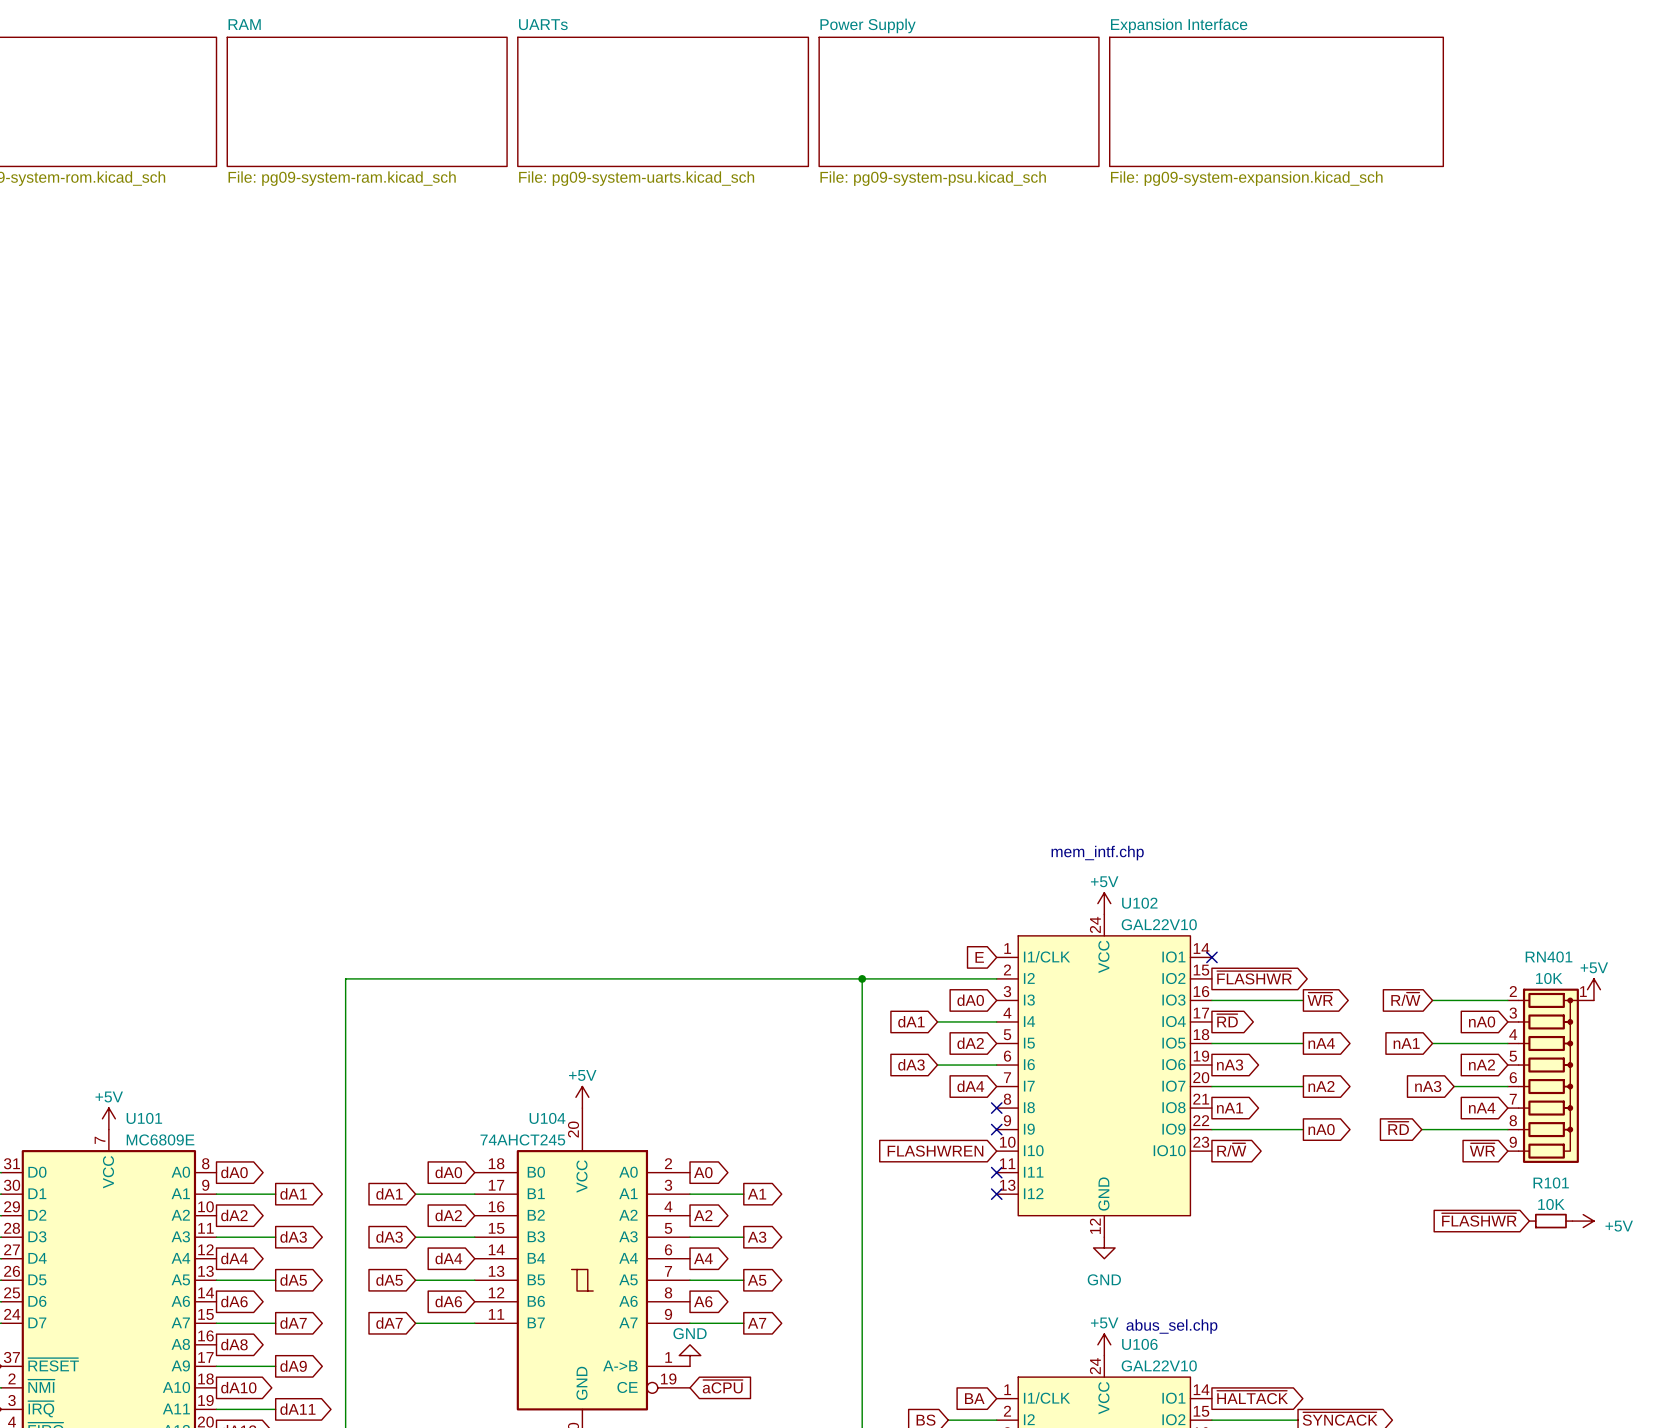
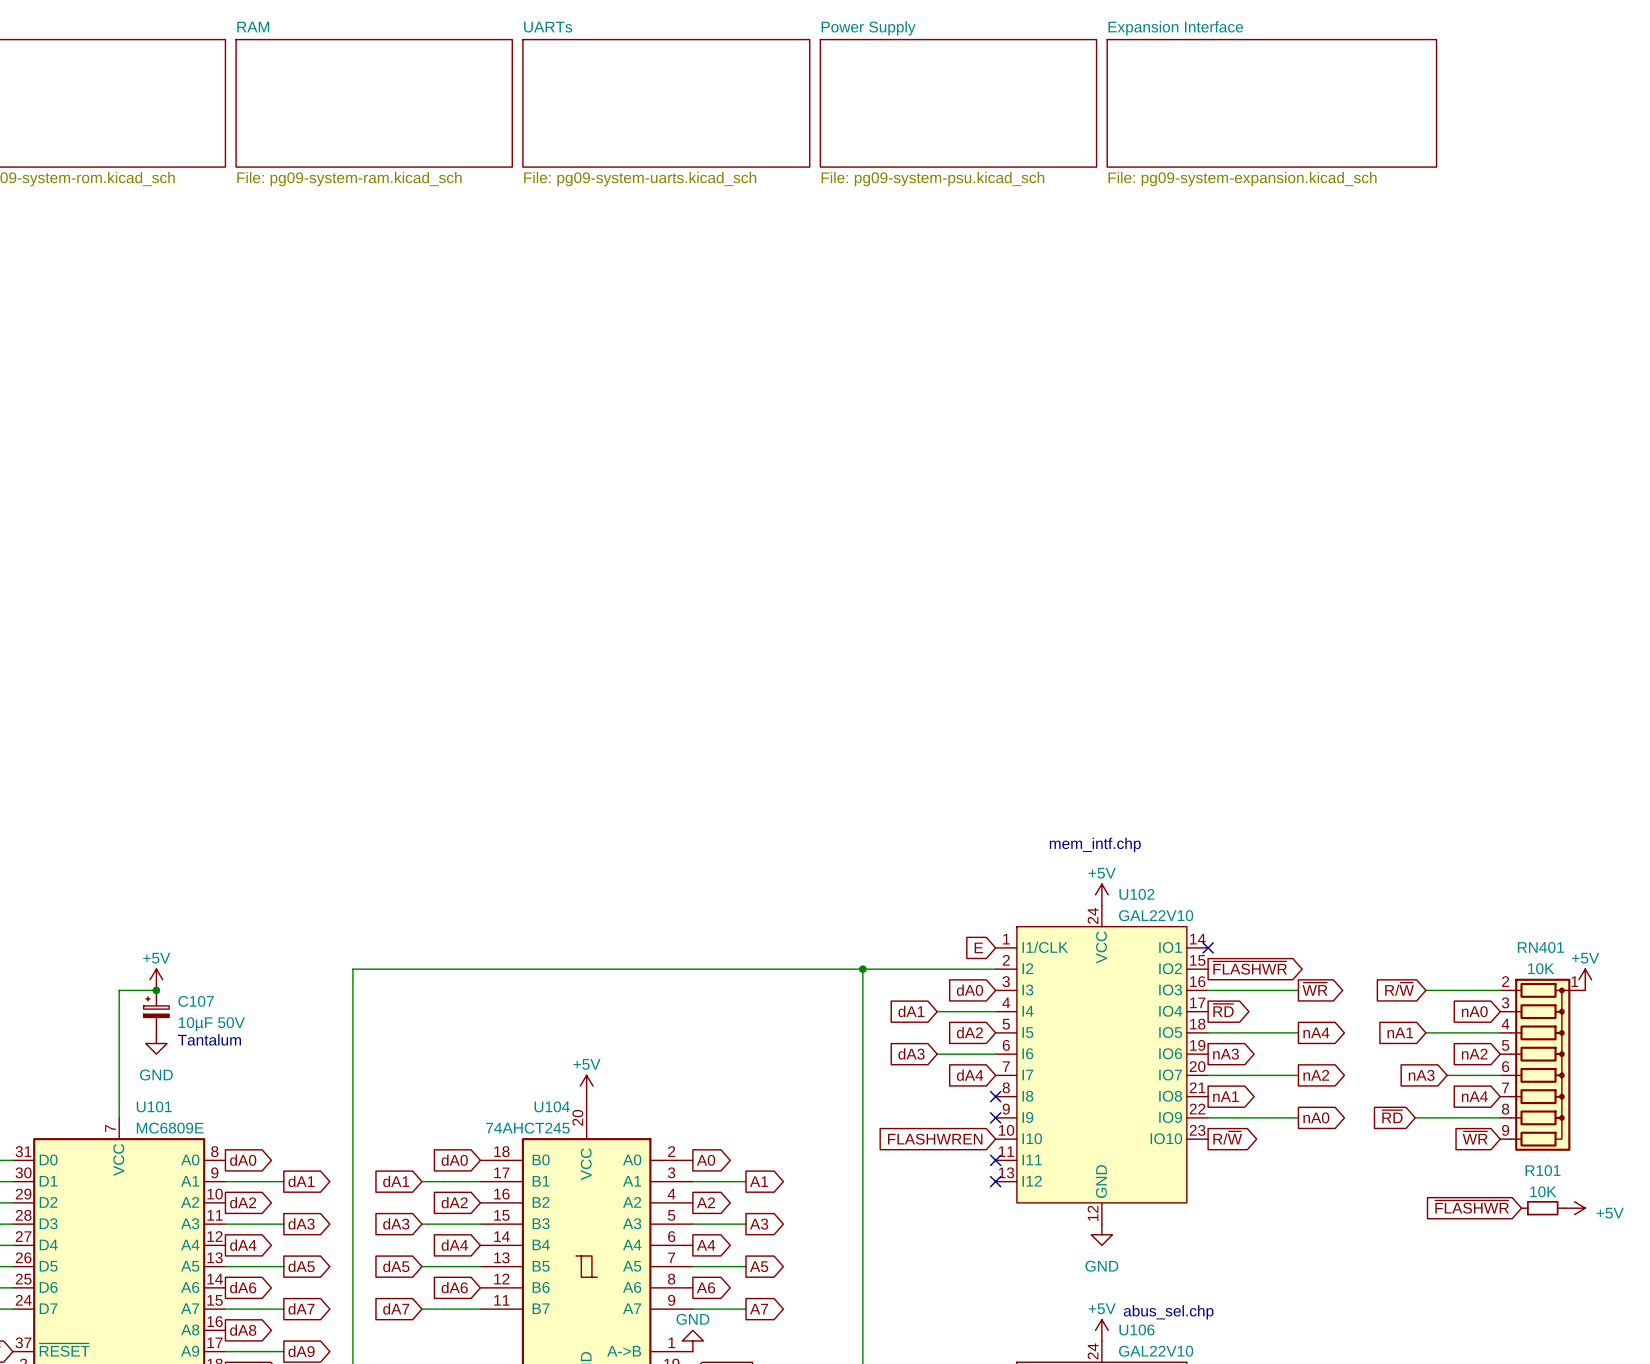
wire: none -> (156, 990) (119, 990) (119, 1117)
junction: none -> (156, 990)
C107: none -> 10µF 50V (156, 1011)
text: none -> Tantalum (209, 1039)
power symbol: none -> GND (156, 1043)
power symbol position: +5V (108, 1118) -> +5V (156, 979)

